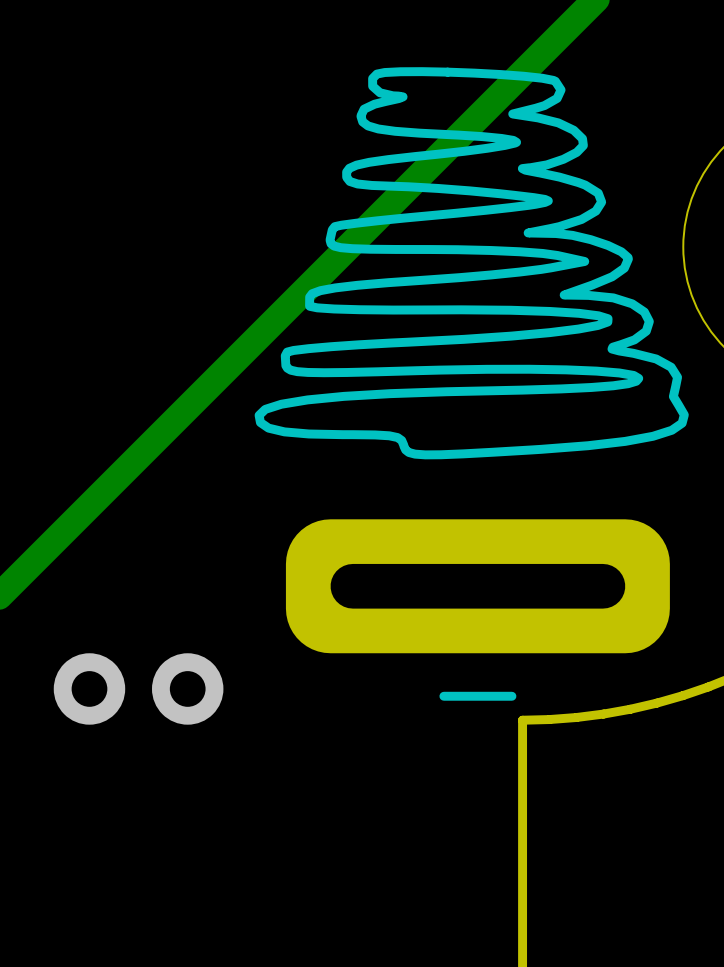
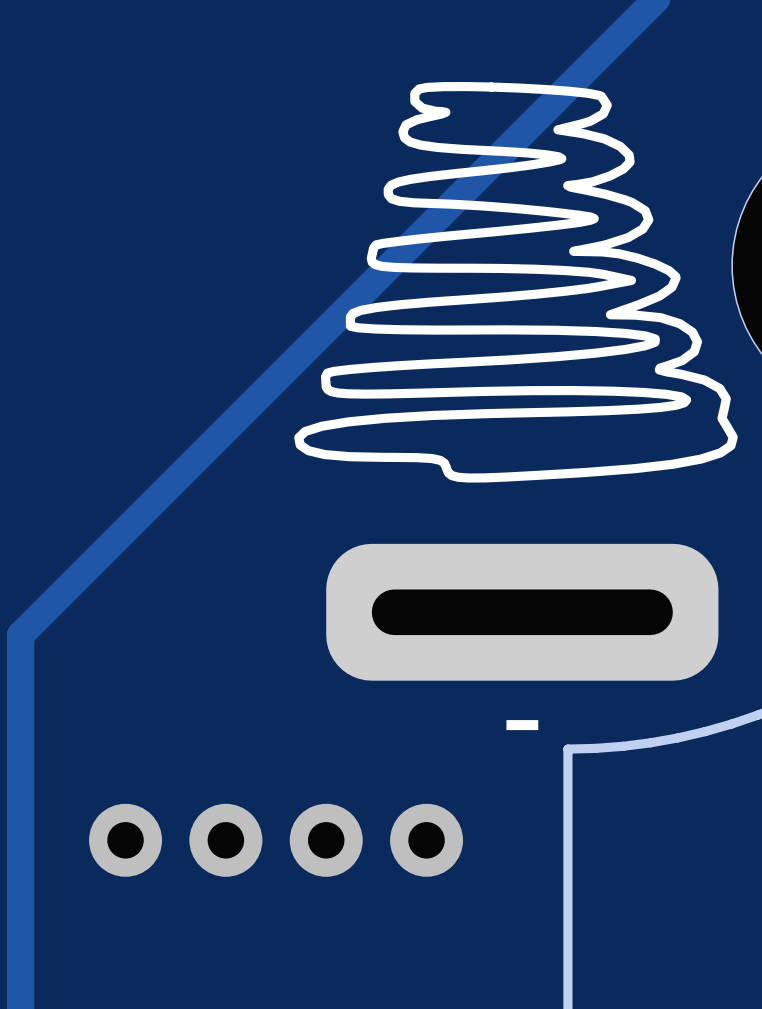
via: (89, 688) -> none
via: (187, 688) -> none
via: none -> (125, 840)
via: none -> (225, 840)
via: none -> (326, 840)
via: none -> (426, 840)

